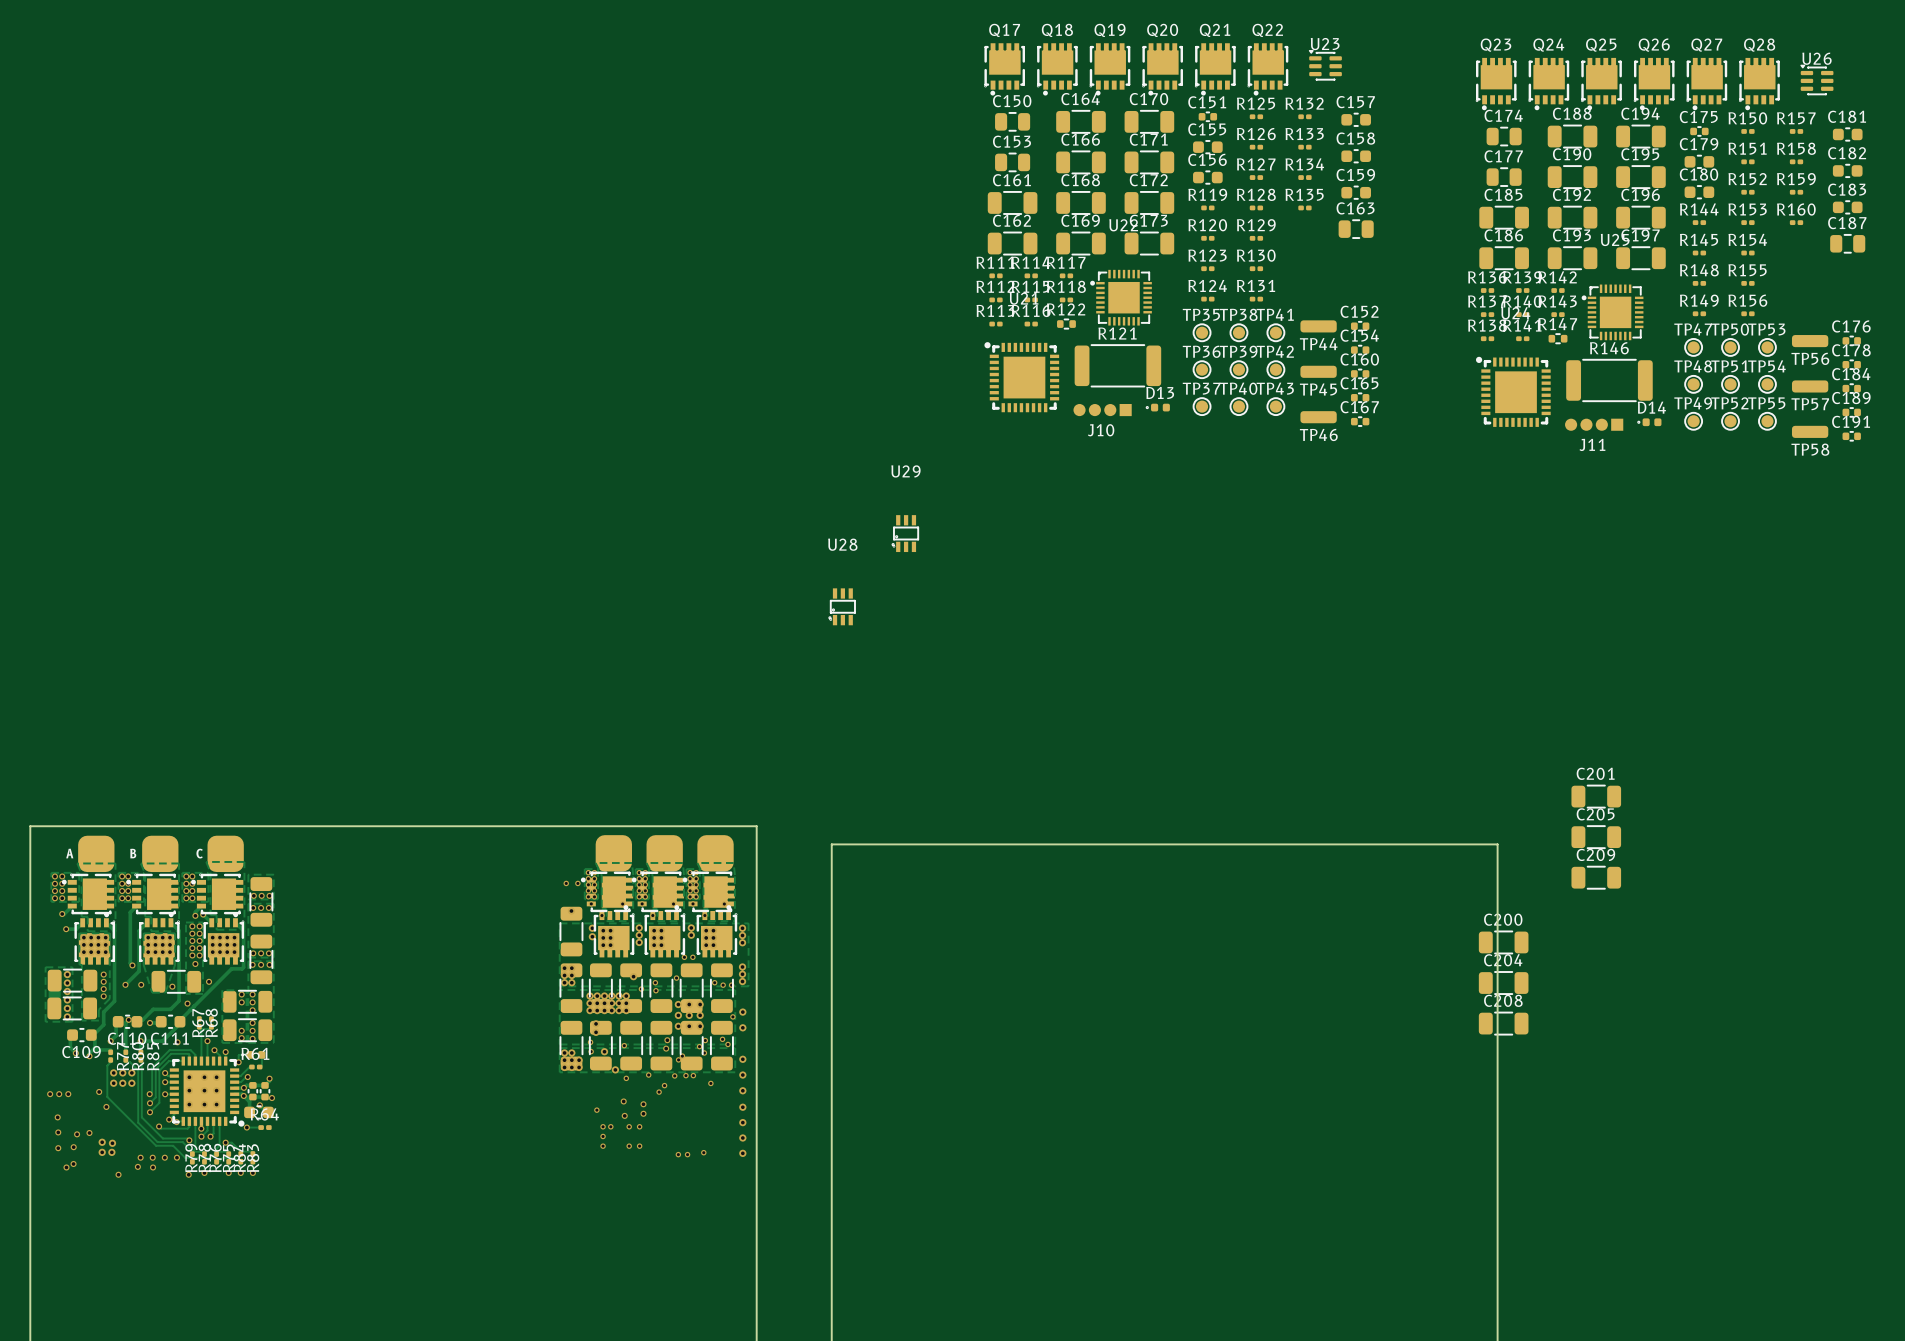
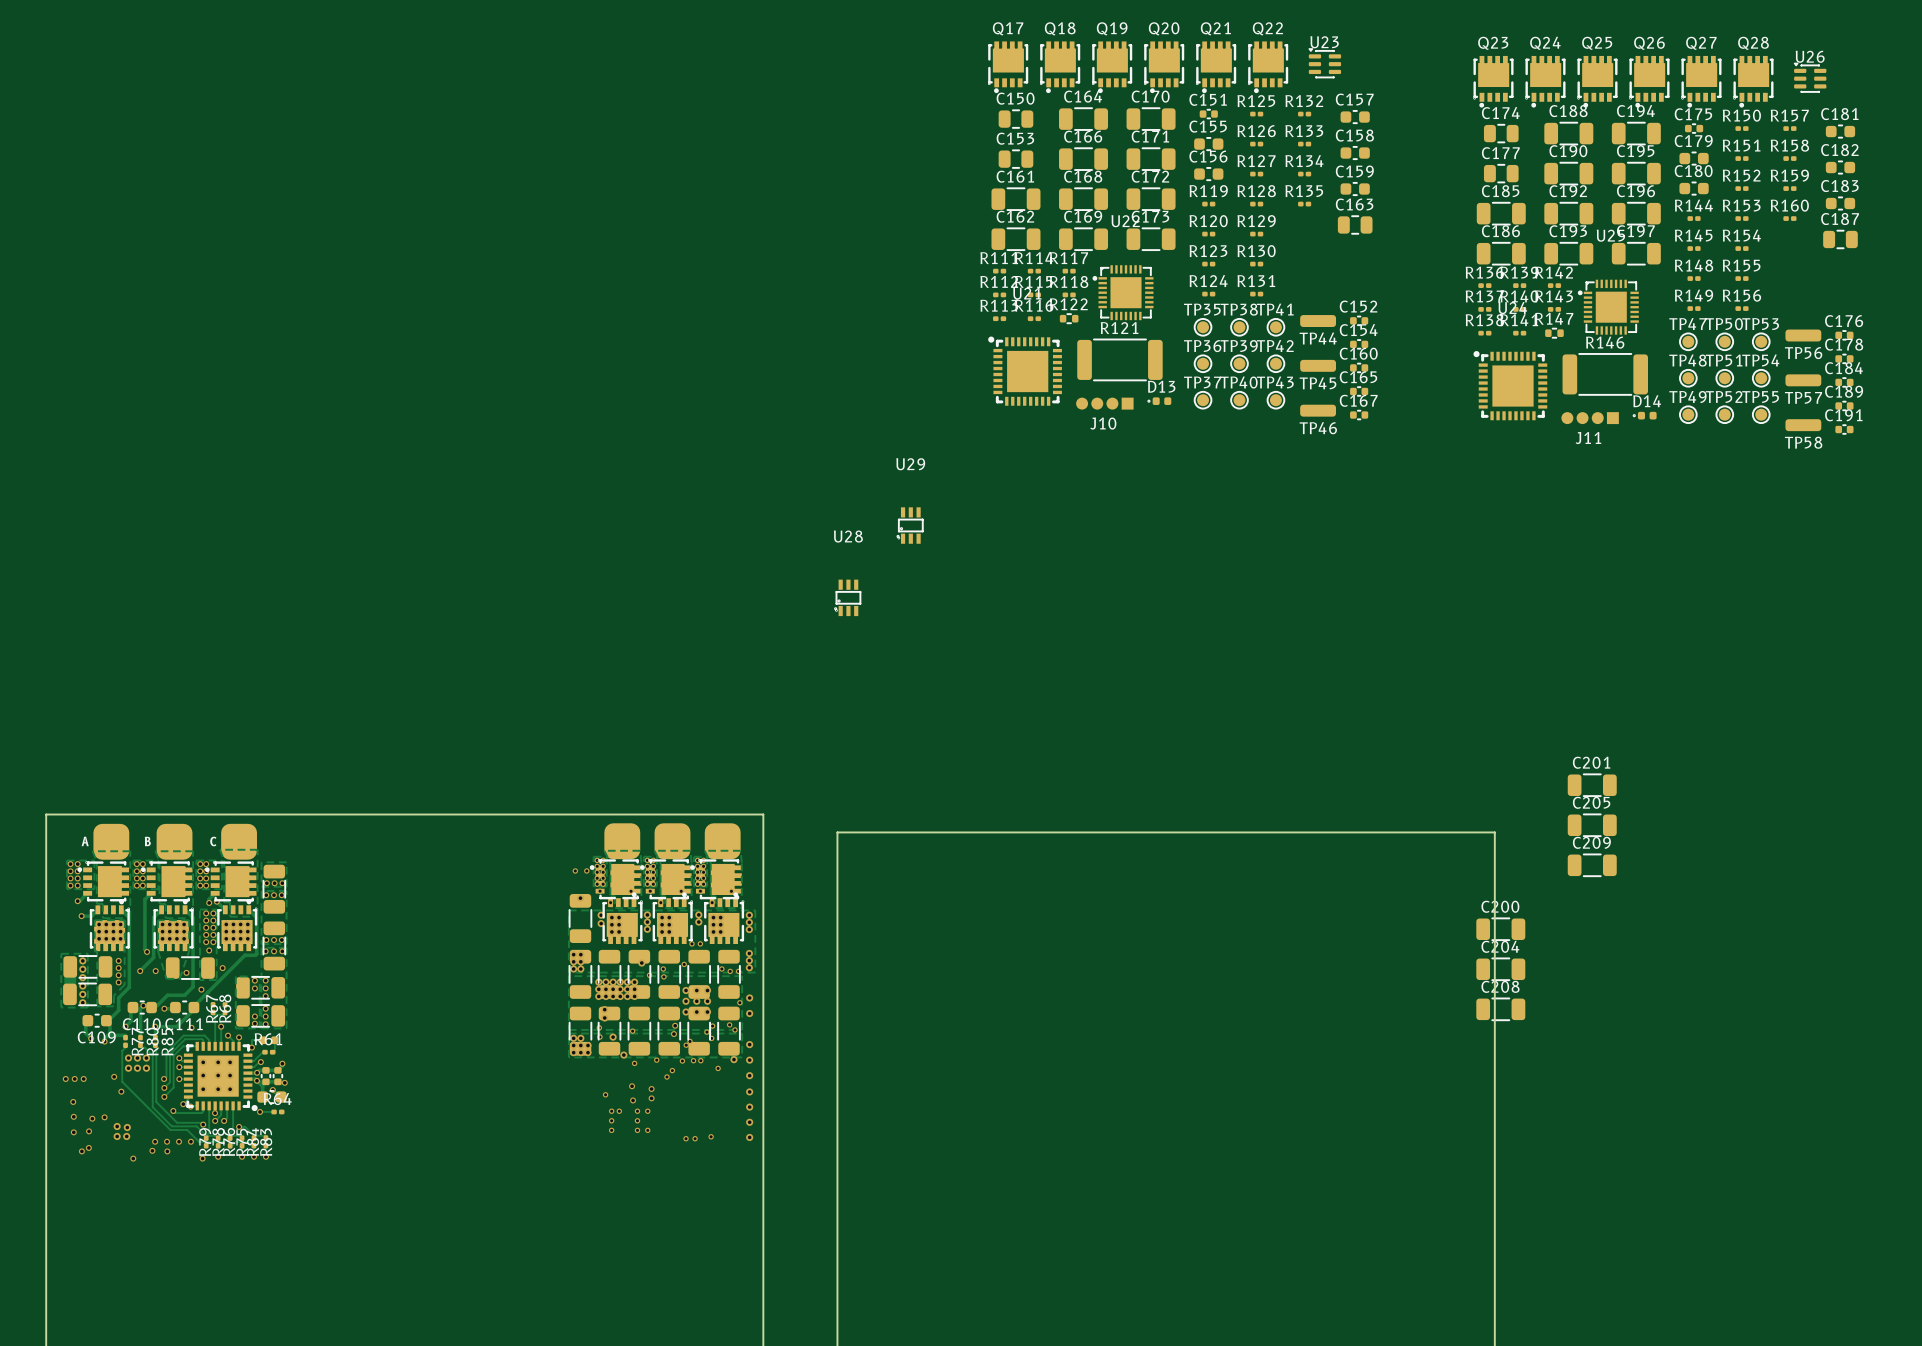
via: none -> (733, 1059)
via: none -> (637, 1120)

